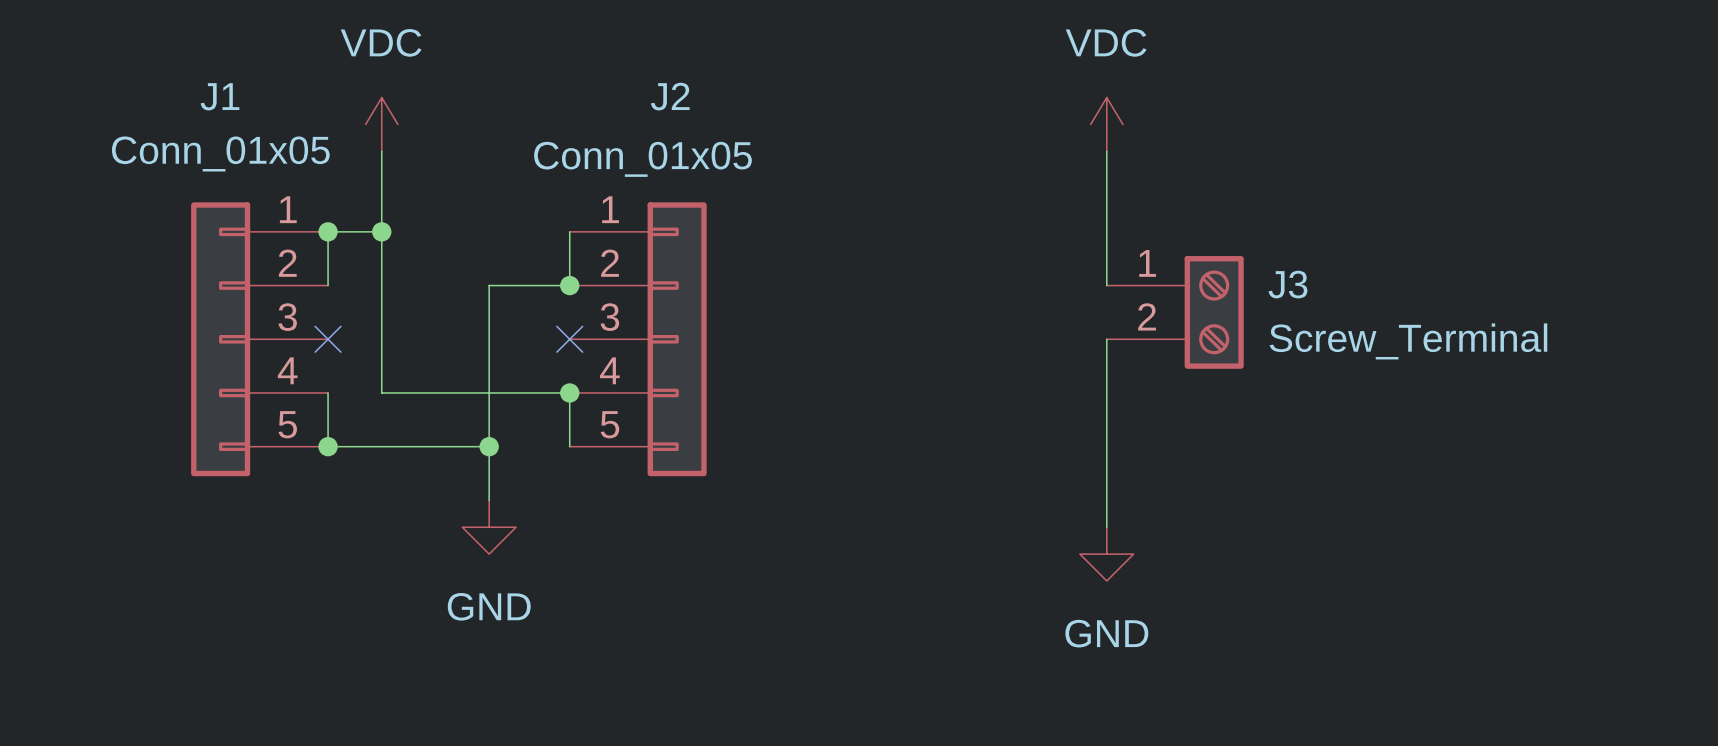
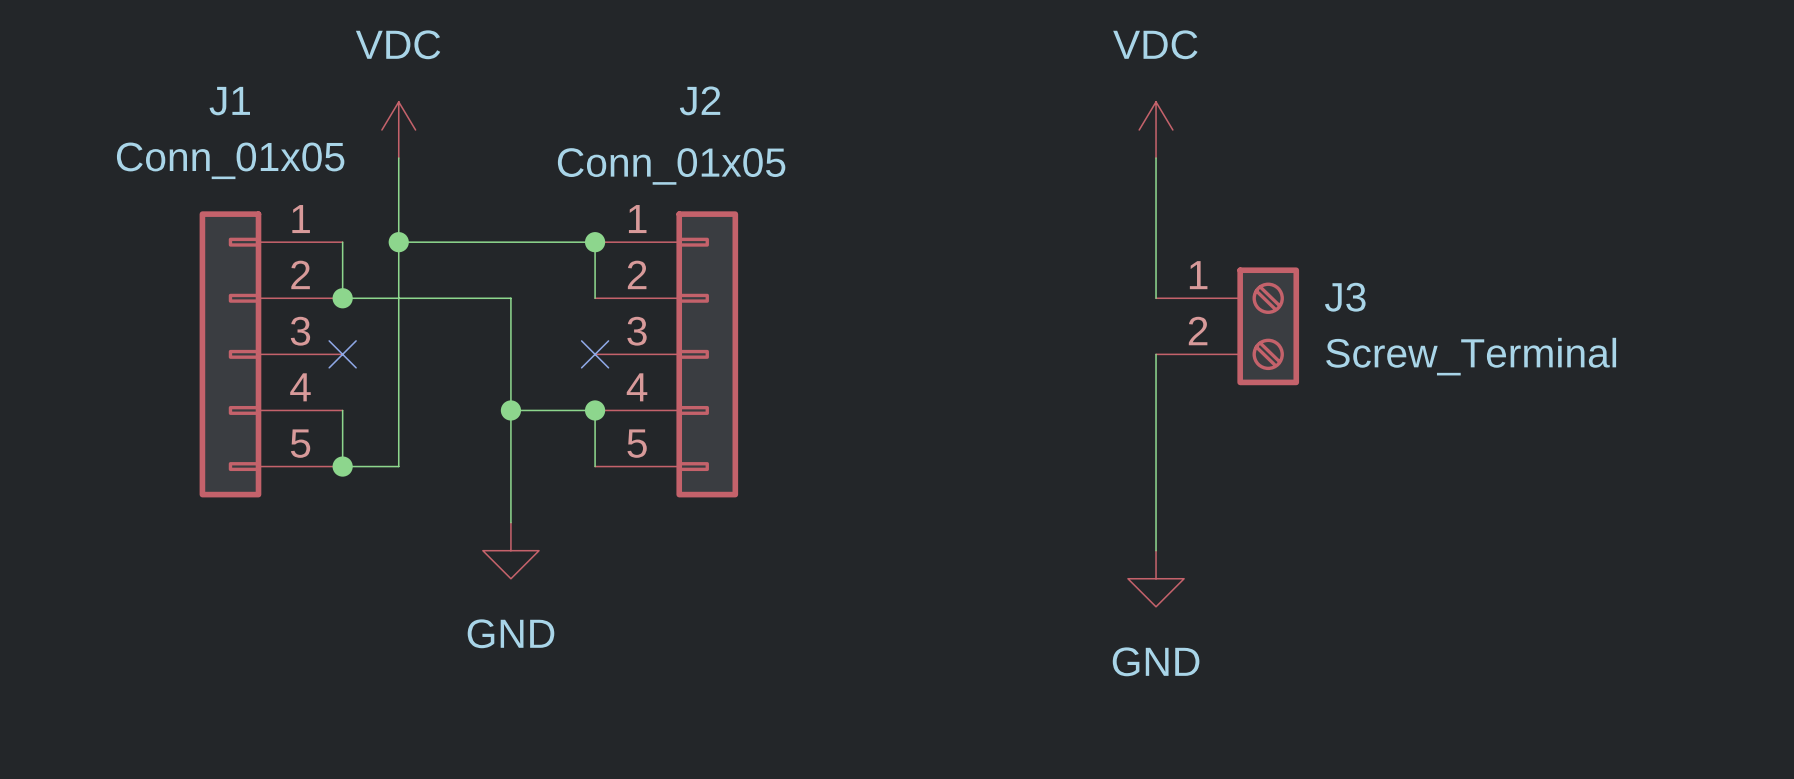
wire: (328, 231) (381, 231) -> (595, 242) (398, 242)
junction position: (328, 231) -> (342, 298)
wire: (489, 285) (569, 285) -> (510, 298) (342, 298)
junction position: (569, 285) -> (595, 242)
wire: (381, 392) (489, 392) -> (398, 410) (398, 466)
wire: (381, 446) (489, 446) -> none
junction position: (489, 446) -> (510, 410)

